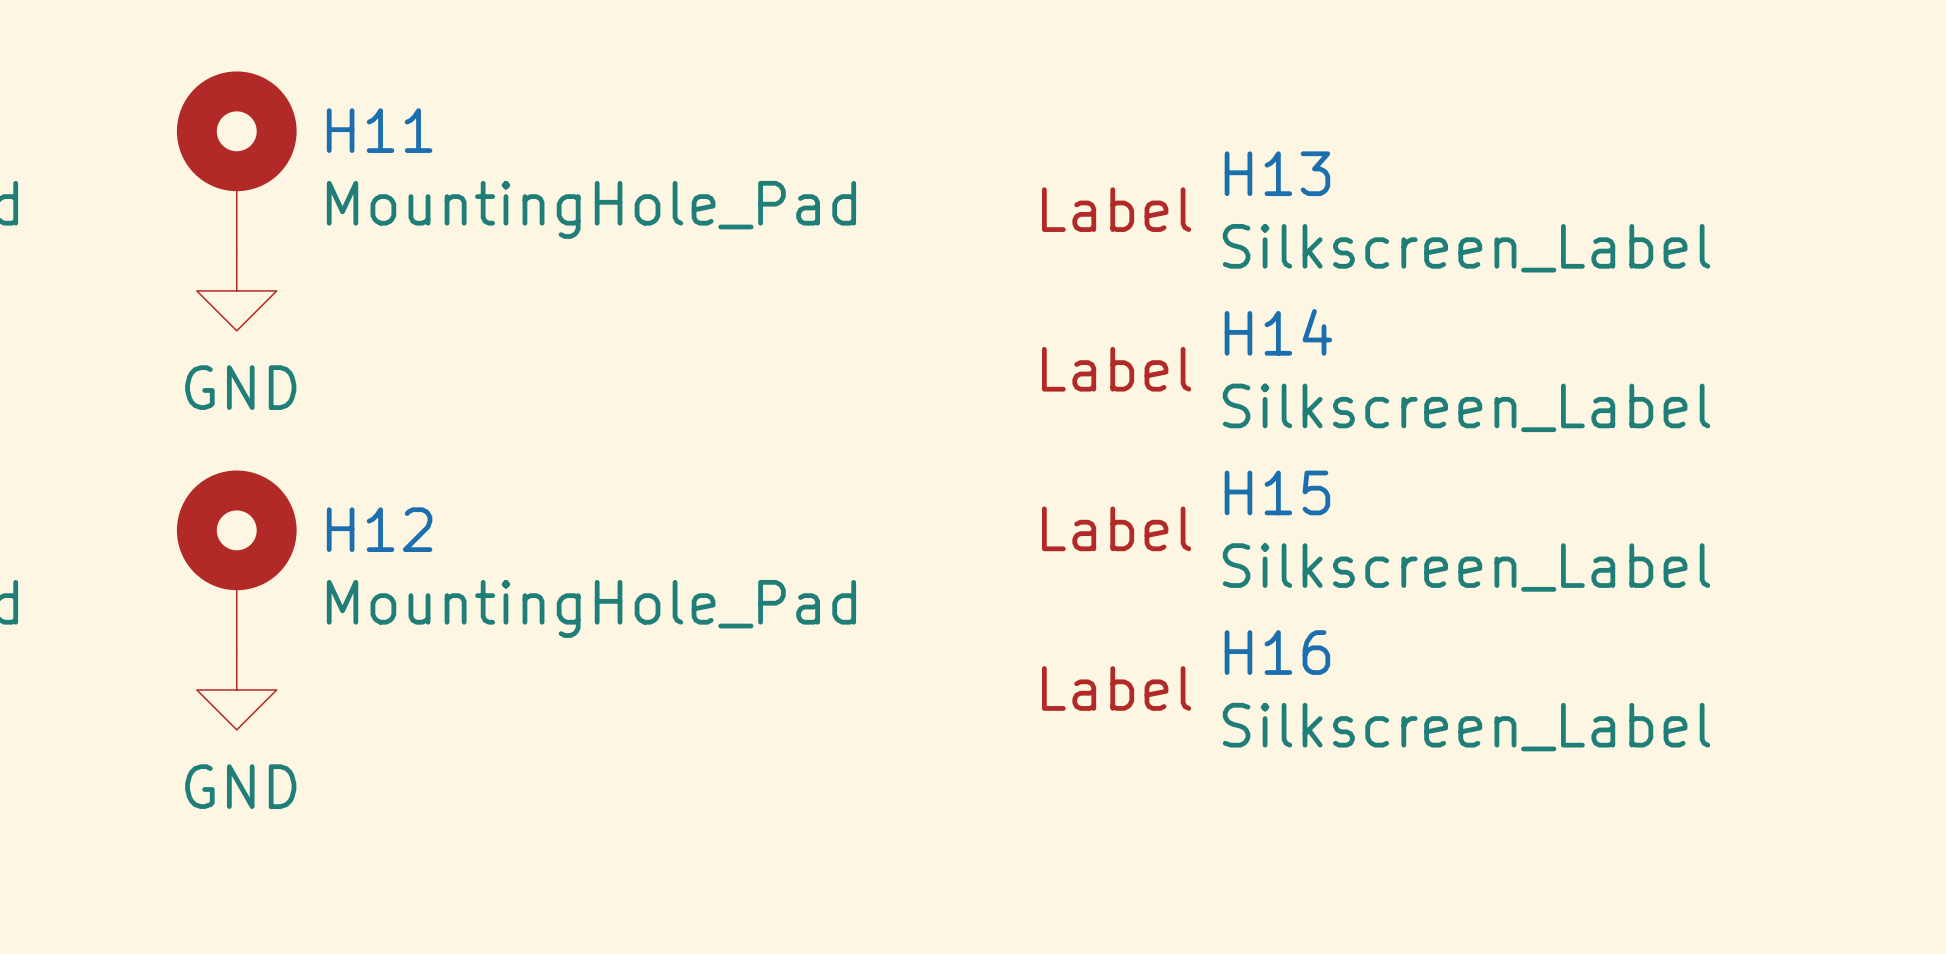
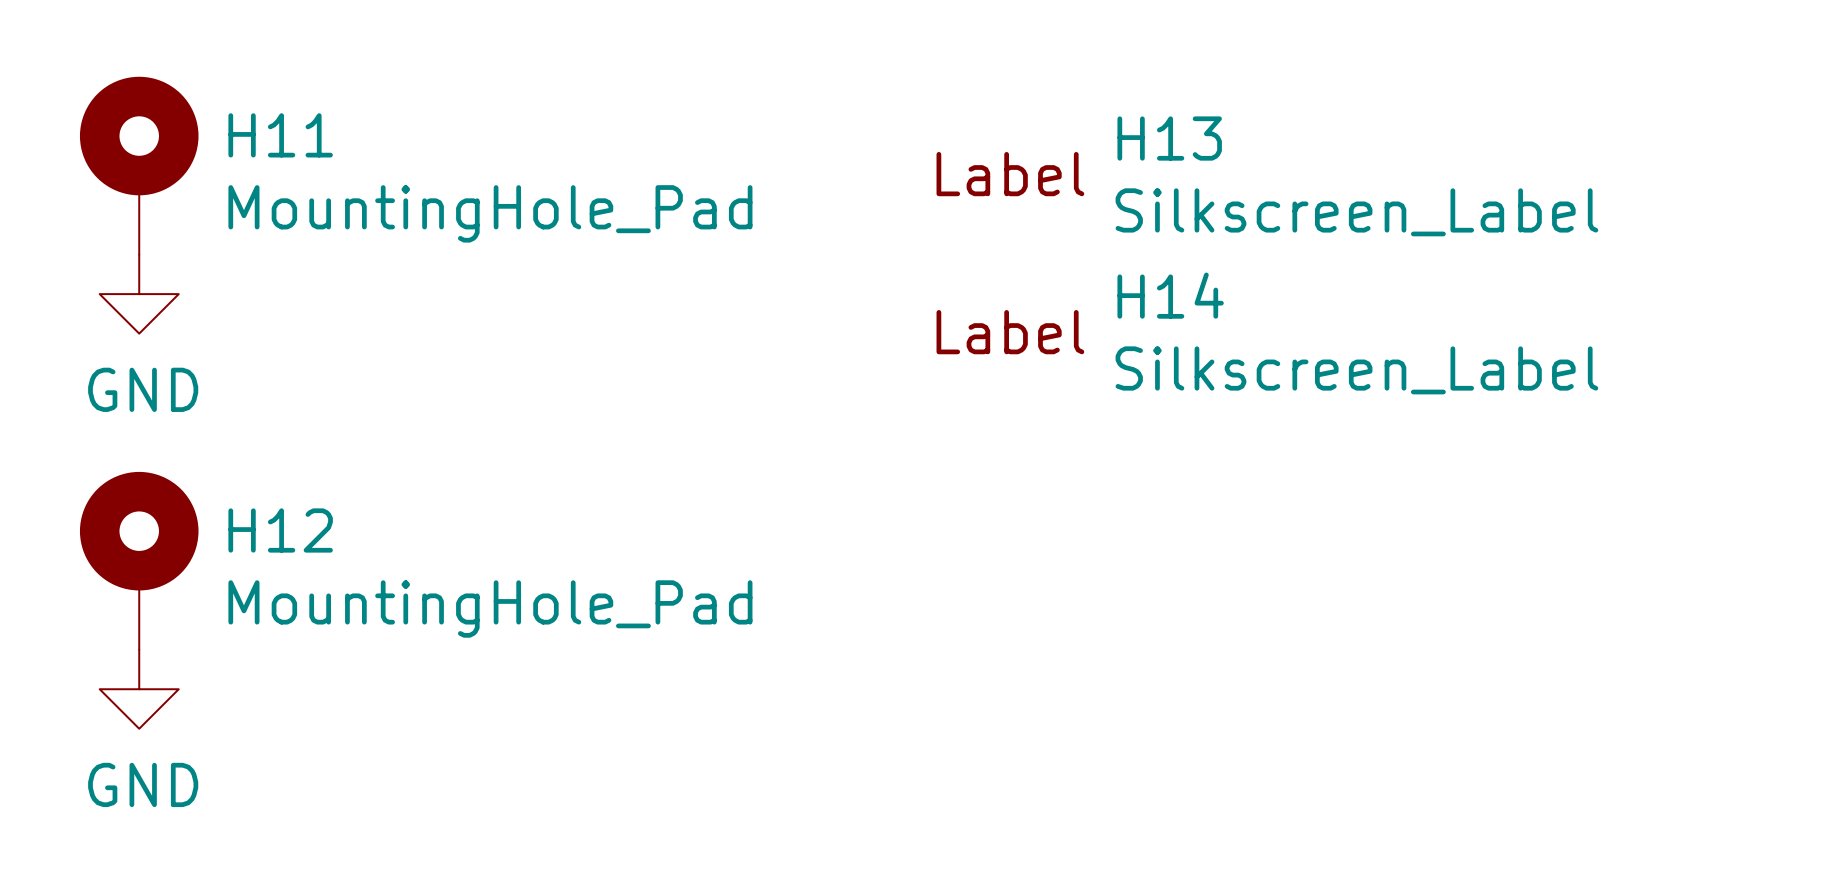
H13 position: (1376, 211) -> (1267, 176)
H14 position: (1376, 370) -> (1267, 333)
H15: Silkscreen_Label (1376, 531) -> none
H16: Silkscreen_Label (1376, 690) -> none

